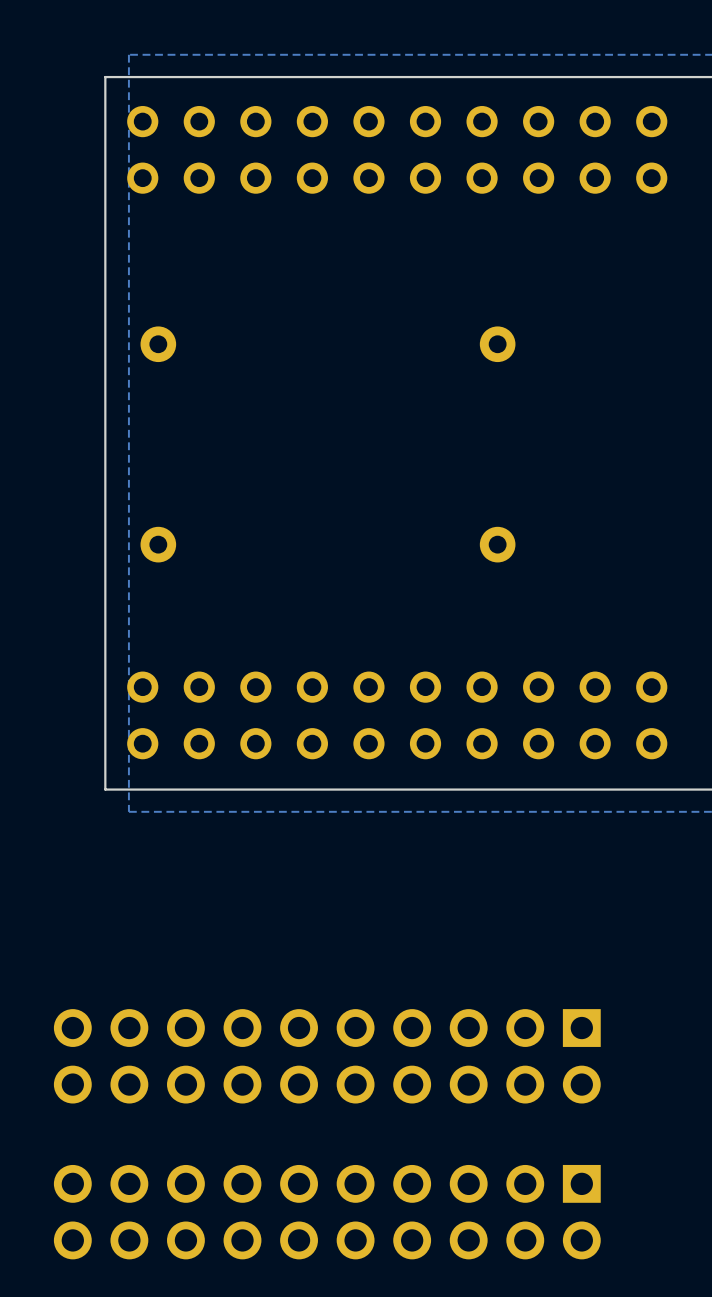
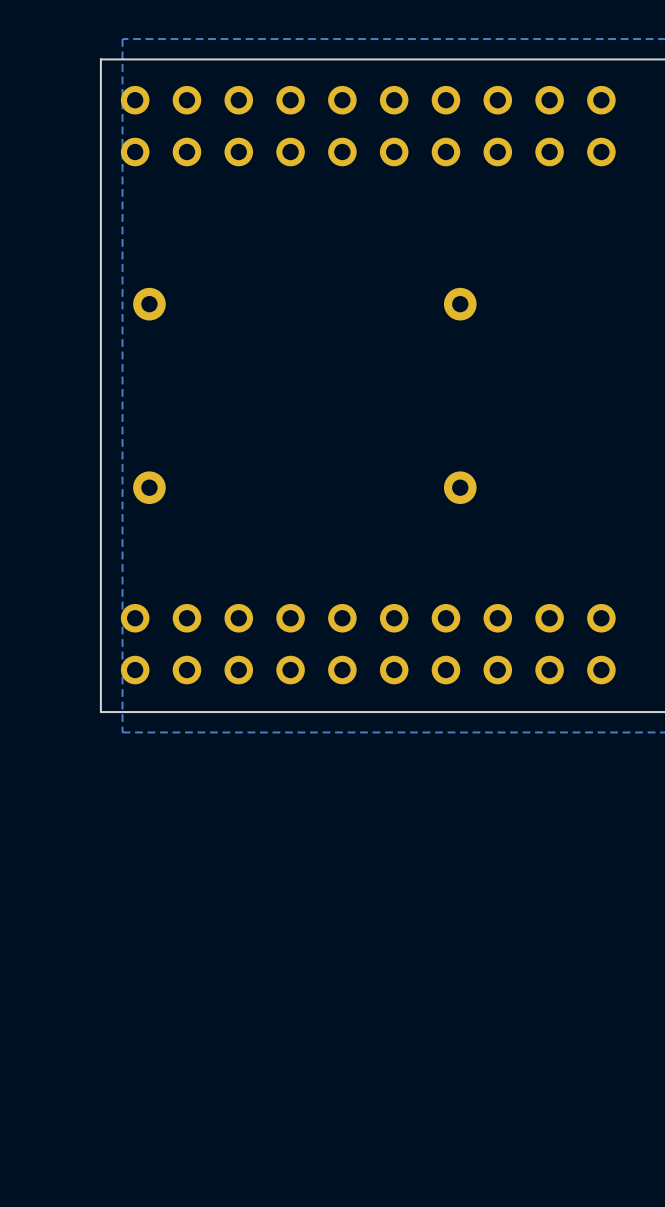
part: (327, 1056) -> none
part: (327, 1212) -> none

